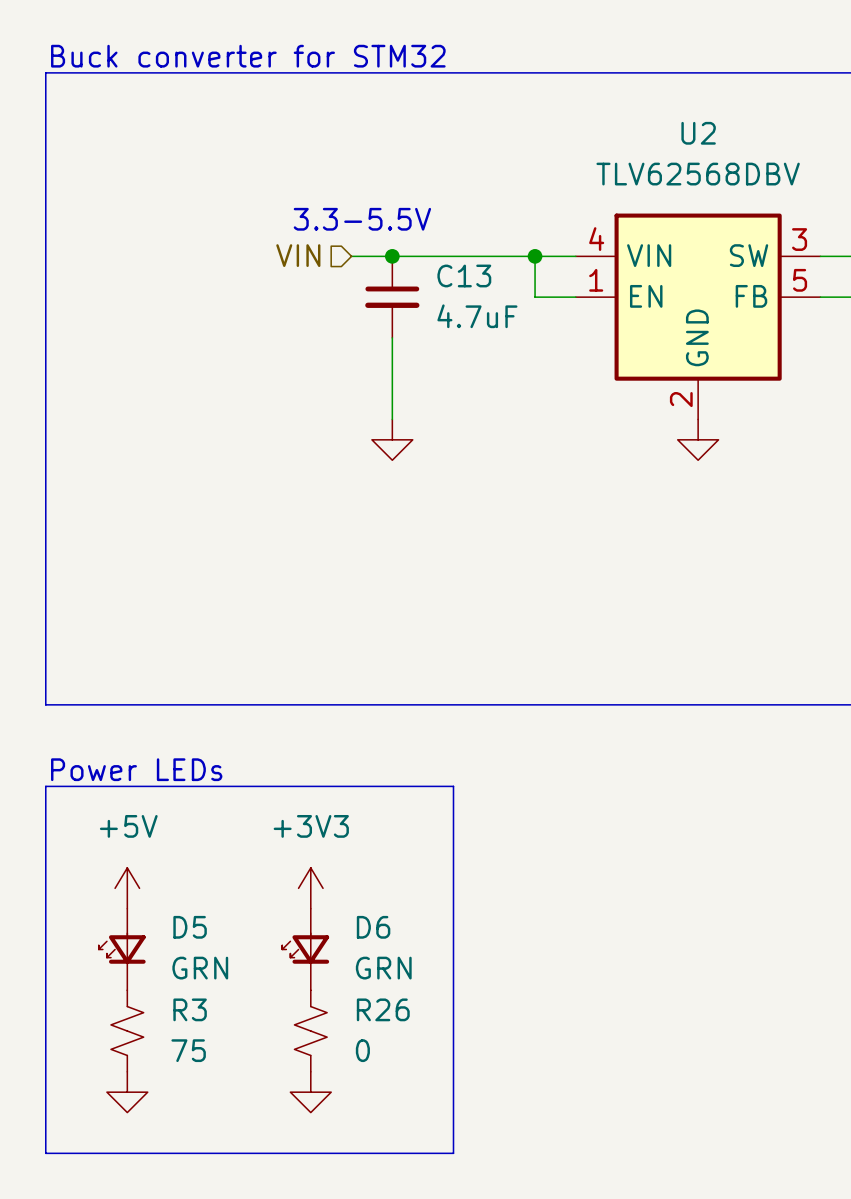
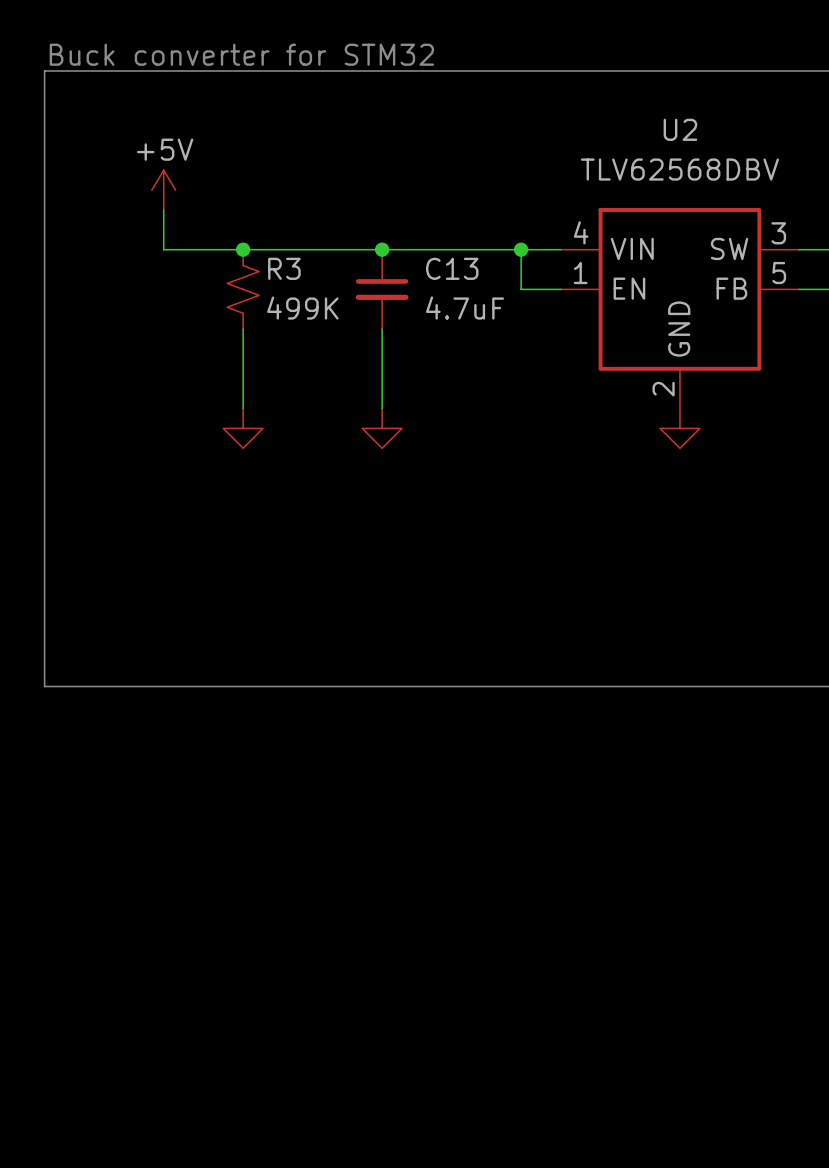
power symbol: none -> +5V (163, 190)
wire: none -> (163, 209) (163, 249) (342, 249)
text: 3.3-5.5V (362, 219) -> none
hierarchical label: VIN (298, 255) -> none
junction: none -> (243, 249)
wire: none -> (243, 329) (243, 408)
power symbol: none -> (243, 428)
text: Power LEDs (136, 769) -> none
line: (45, 786) (453, 786) (453, 1153) (45, 1153) (45, 786) -> none
power symbol: +5V (127, 888) -> none
power symbol: +3V3 (310, 888) -> none
D5: GRN (122, 949) -> none
D6: GRN (305, 949) -> none
R3 name position: R3 (190, 1009) -> R3 (284, 268)
R3 position: (127, 1031) -> (243, 289)
R26: 0 (310, 1031) -> none
R3 value: 75 (188, 1050) -> 499K (302, 308)
power symbol: (127, 1092) -> none
power symbol: (310, 1092) -> none

